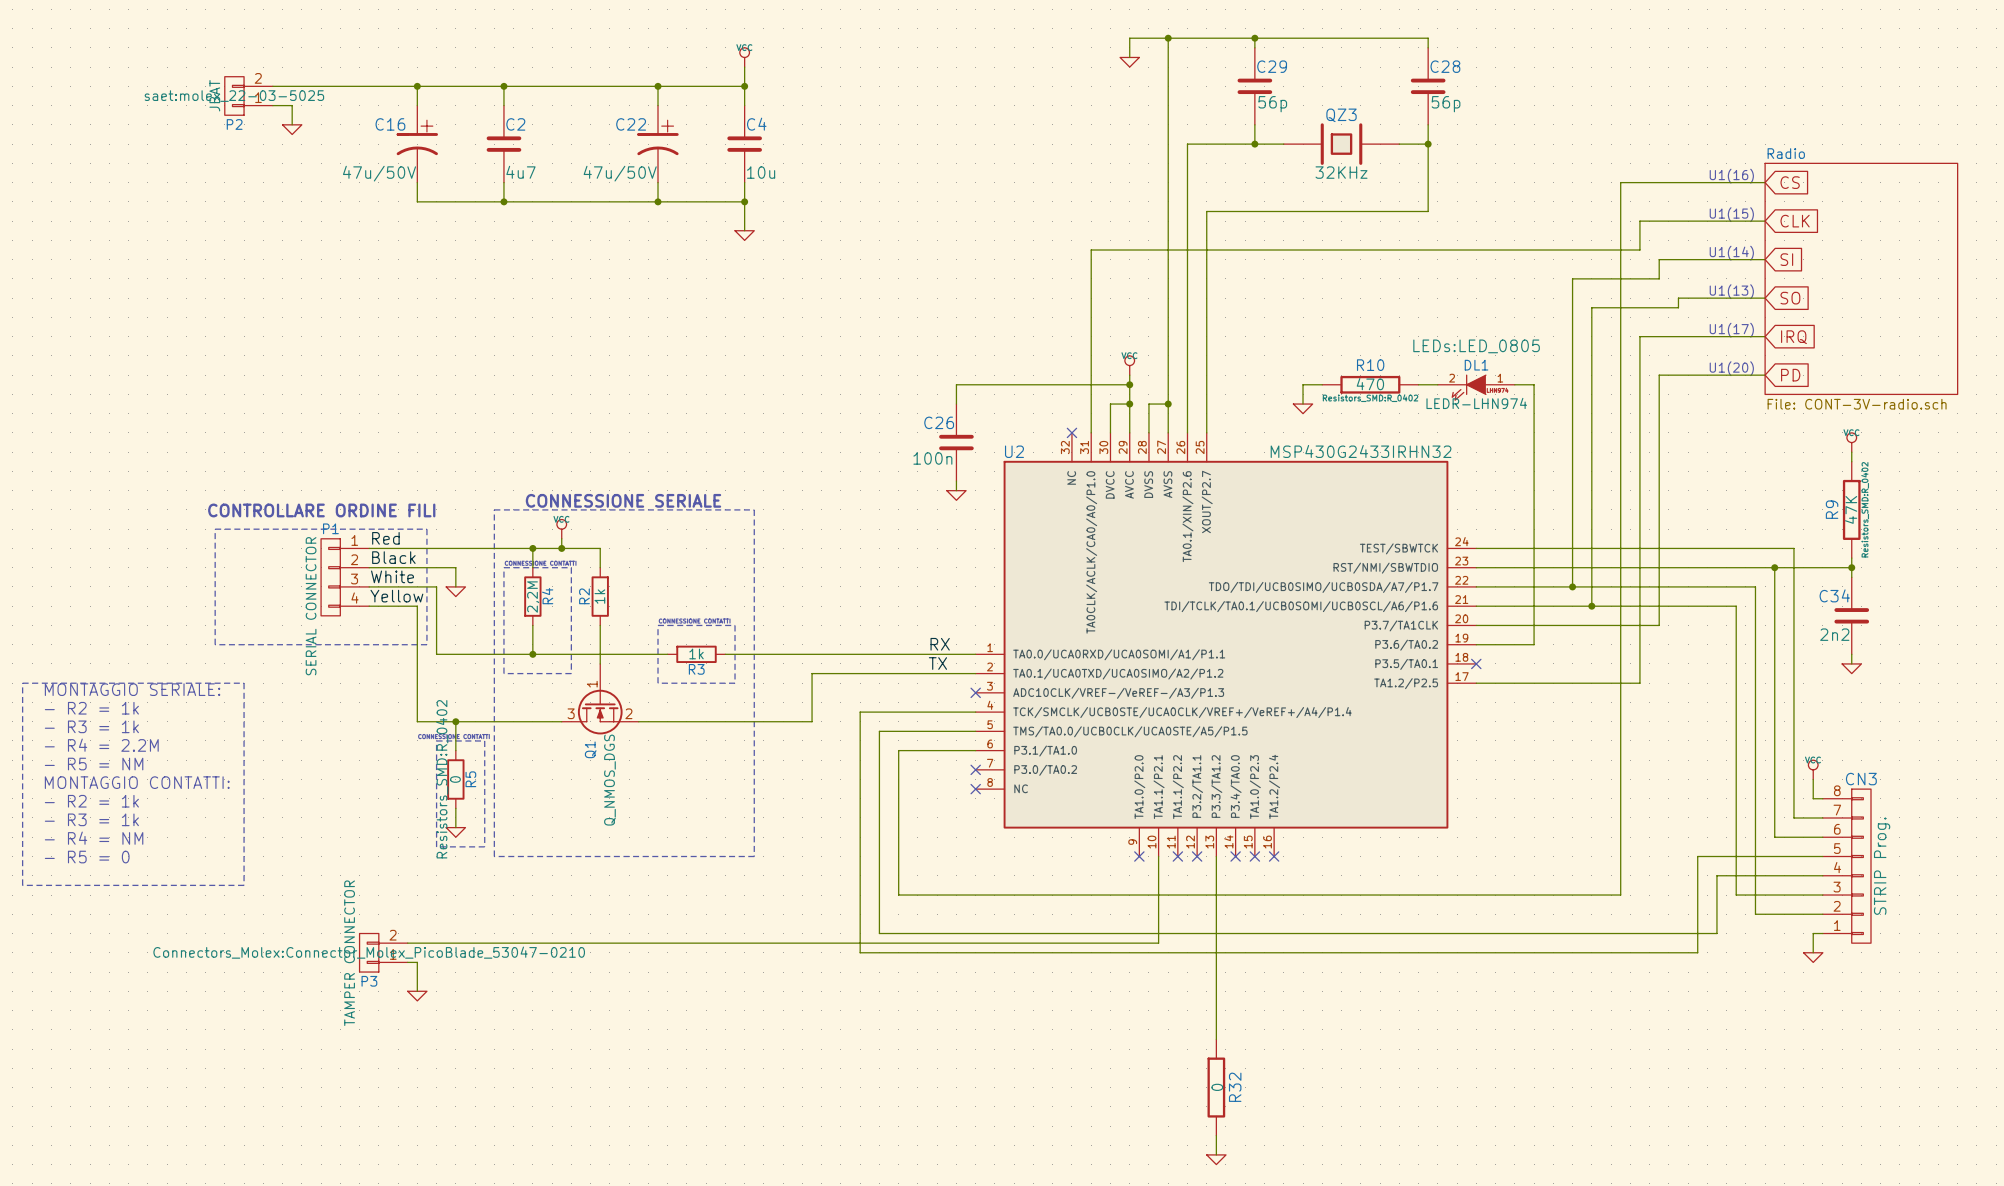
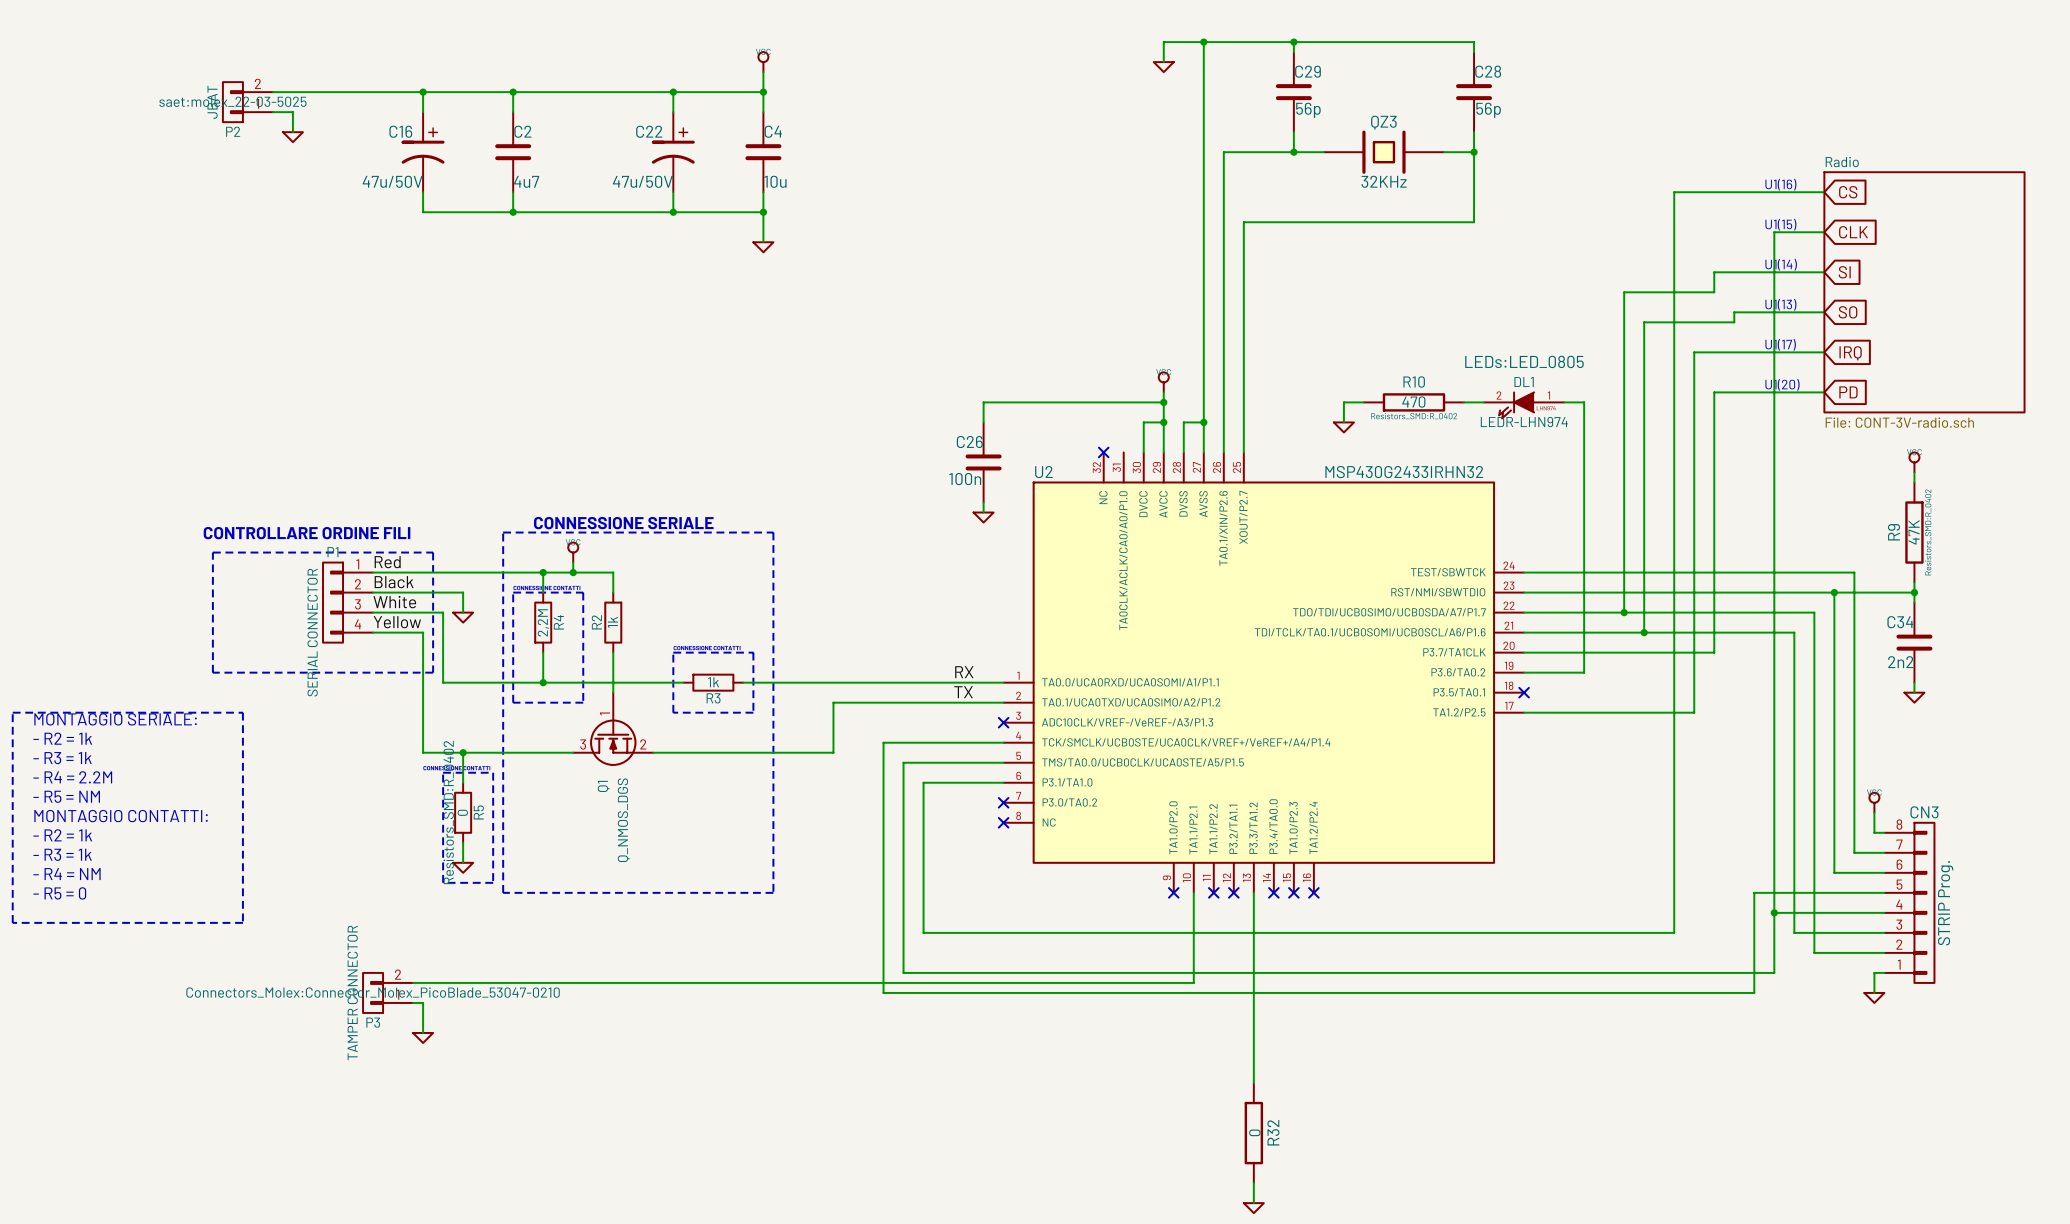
wire: (1716, 221) (1639, 221) (1639, 250) (1091, 250) (1091, 432) -> (1774, 232) (1774, 912)
junction: none -> (1774, 912)

